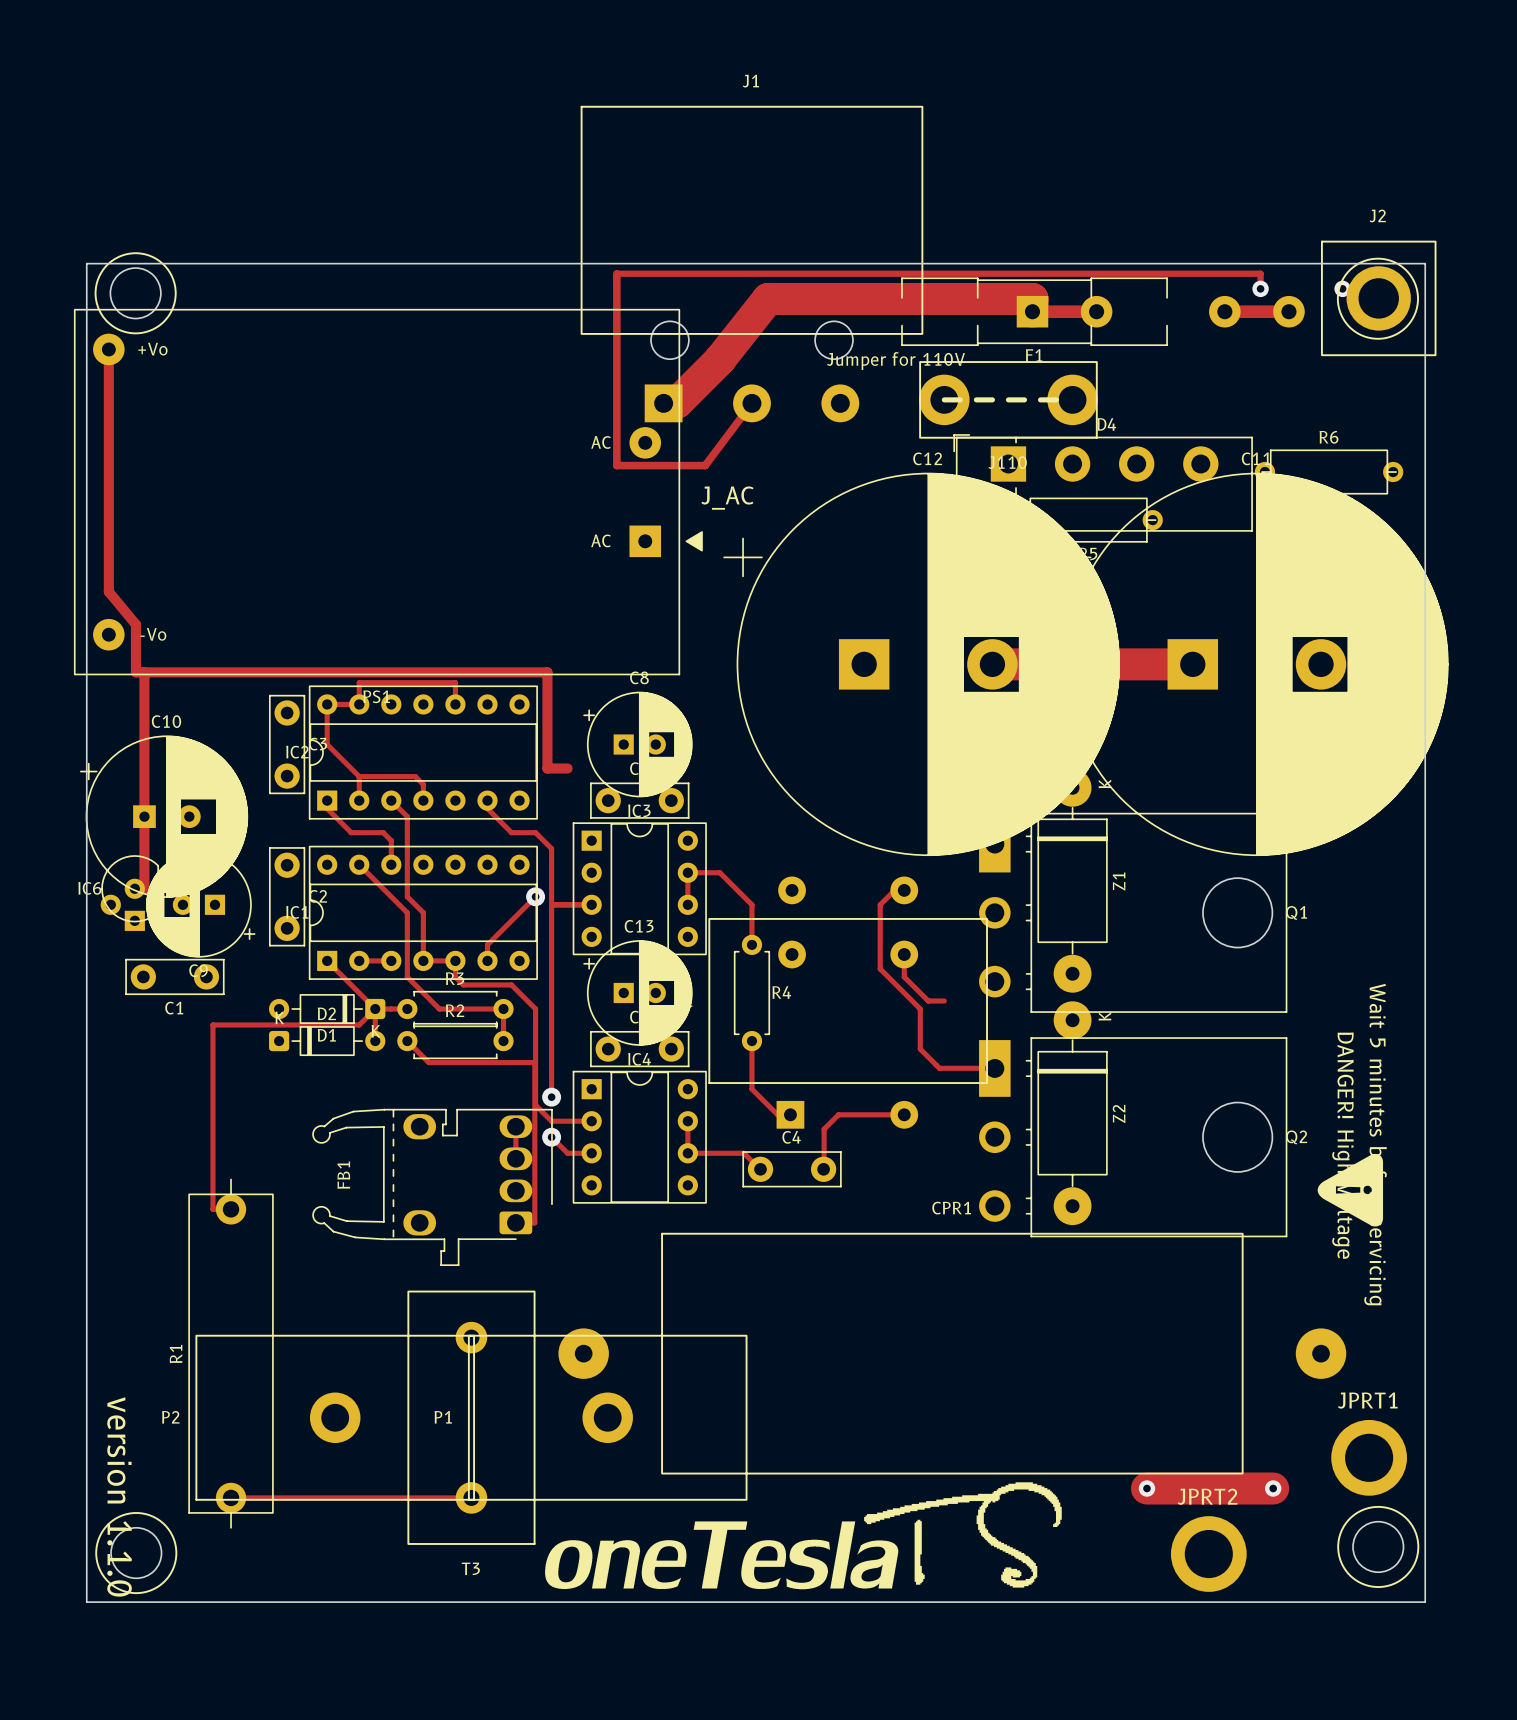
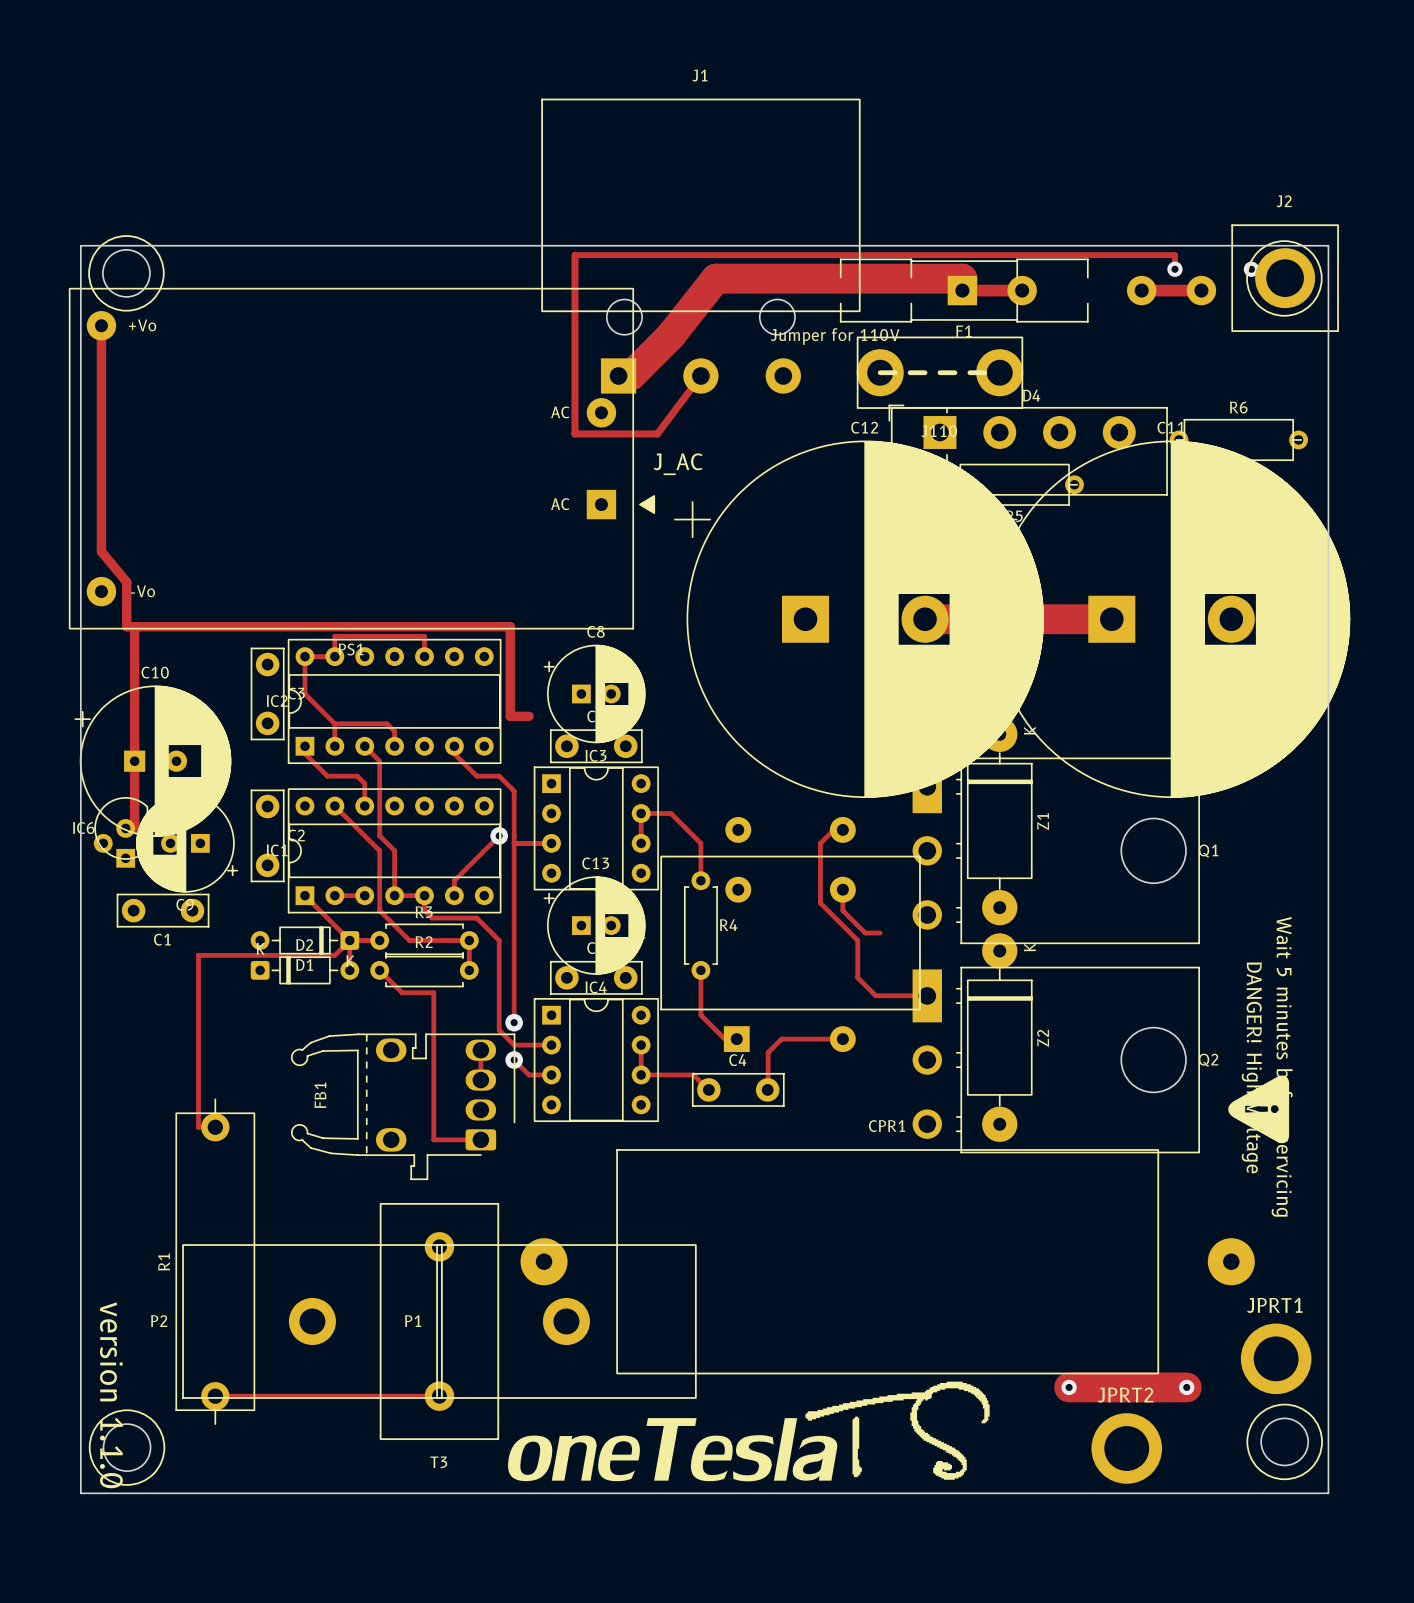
track: (428, 1062) (534, 1062) (534, 1222) (515, 1222) -> (399, 990) (402, 992) (433, 992) (433, 1139) (480, 1139)

